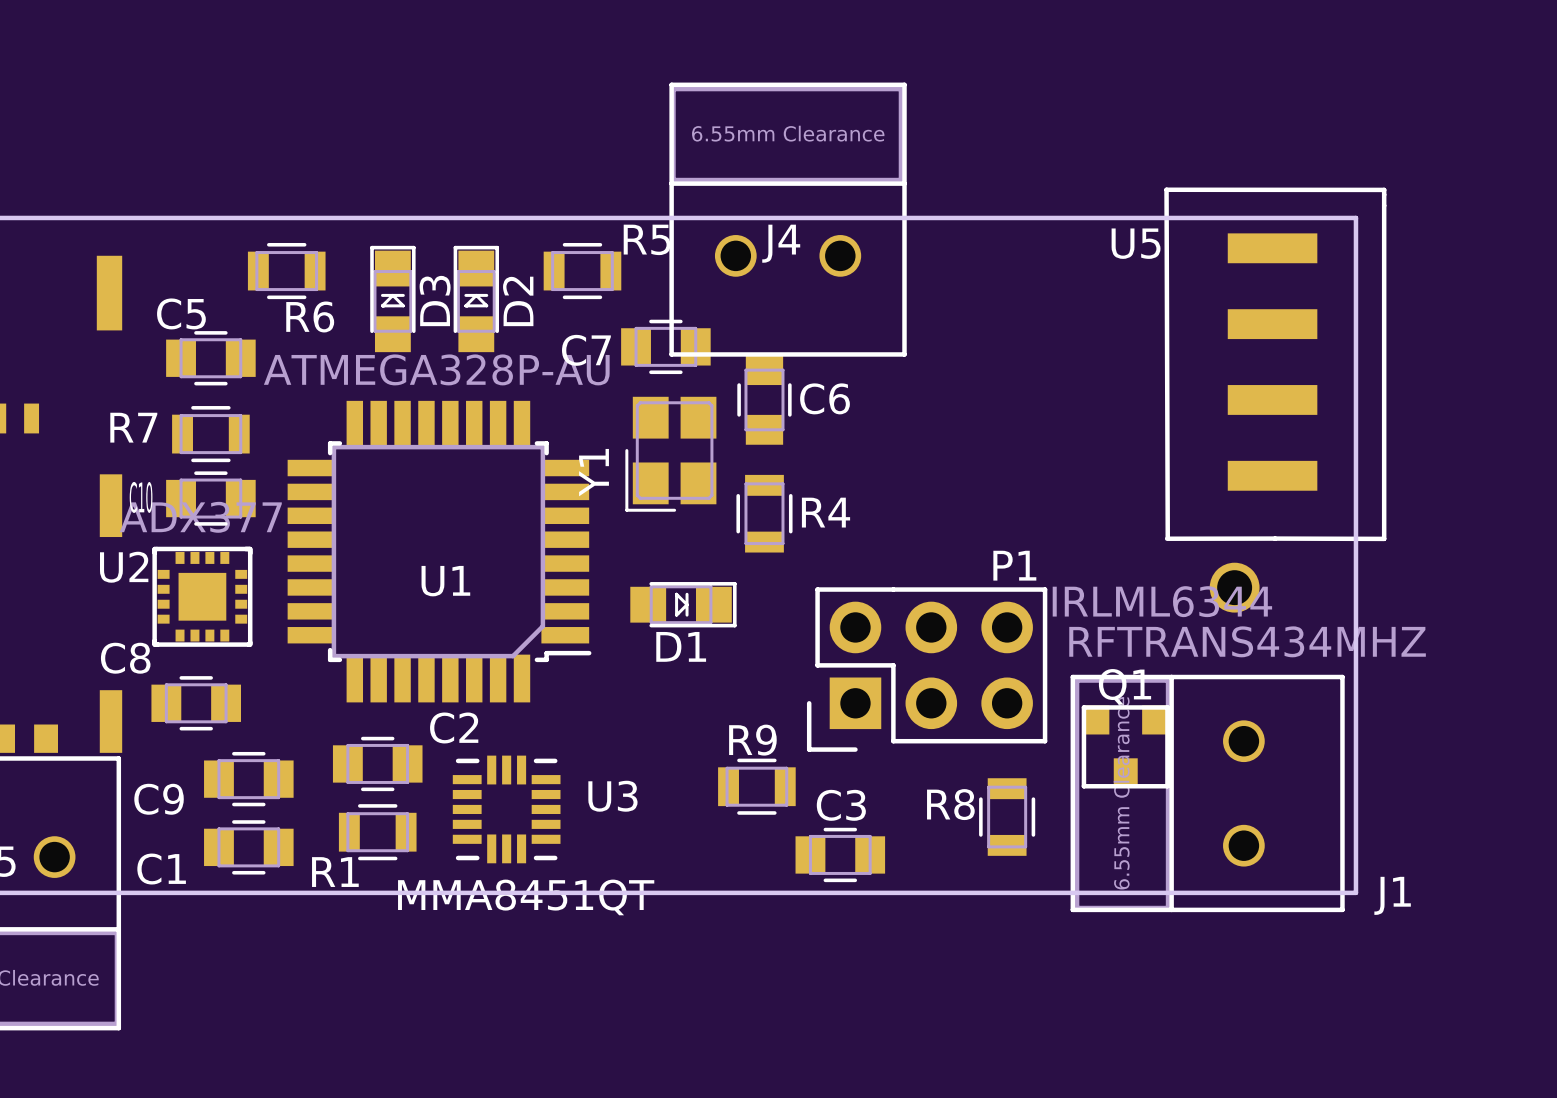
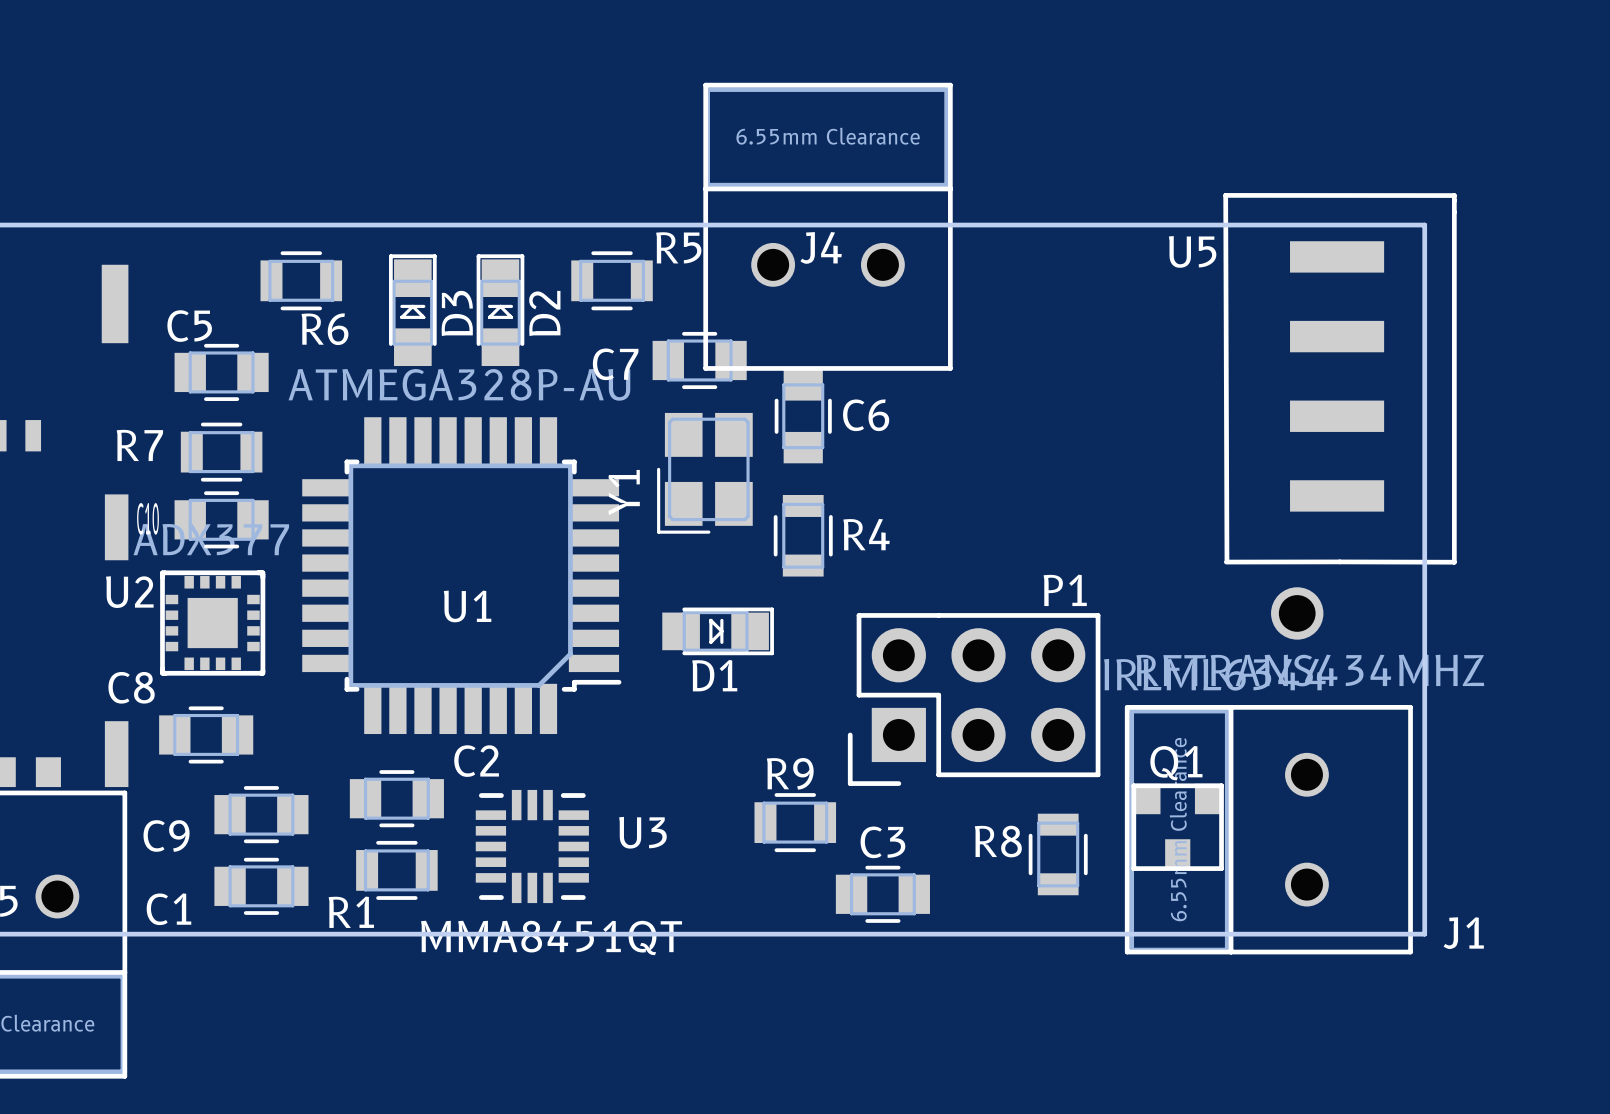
Q1 position: (1125, 746) -> (1177, 827)

